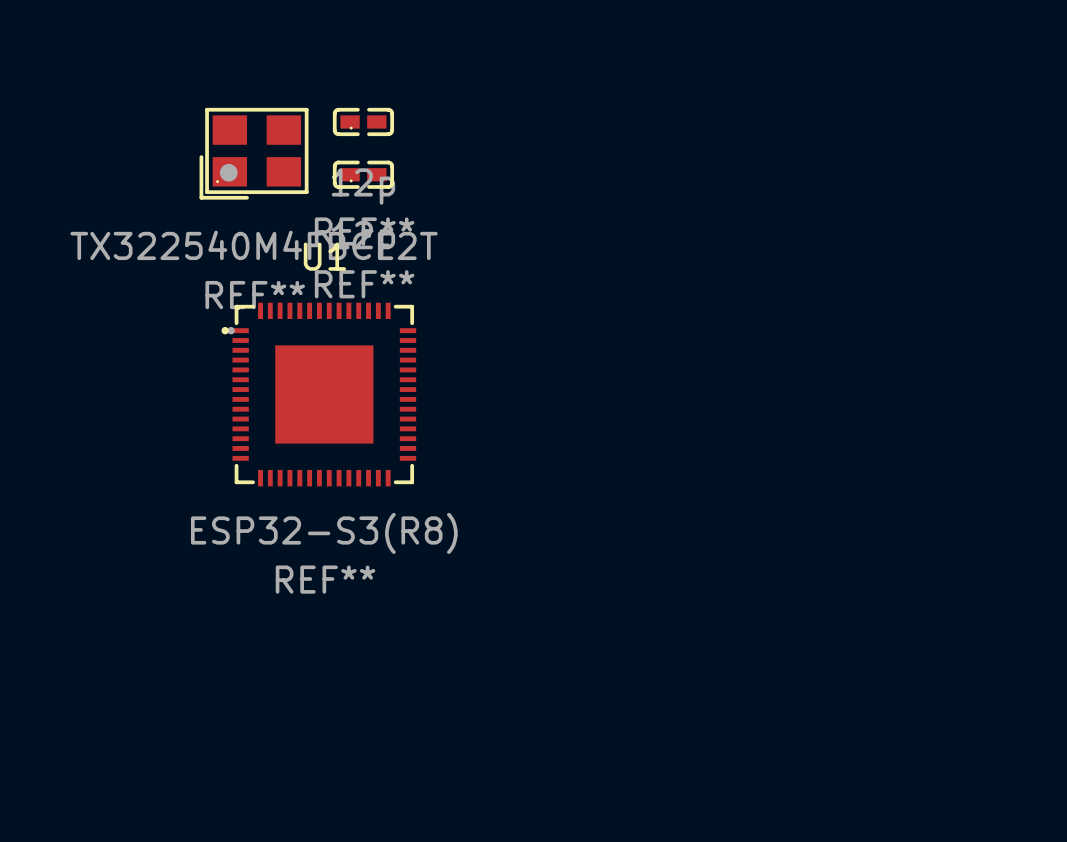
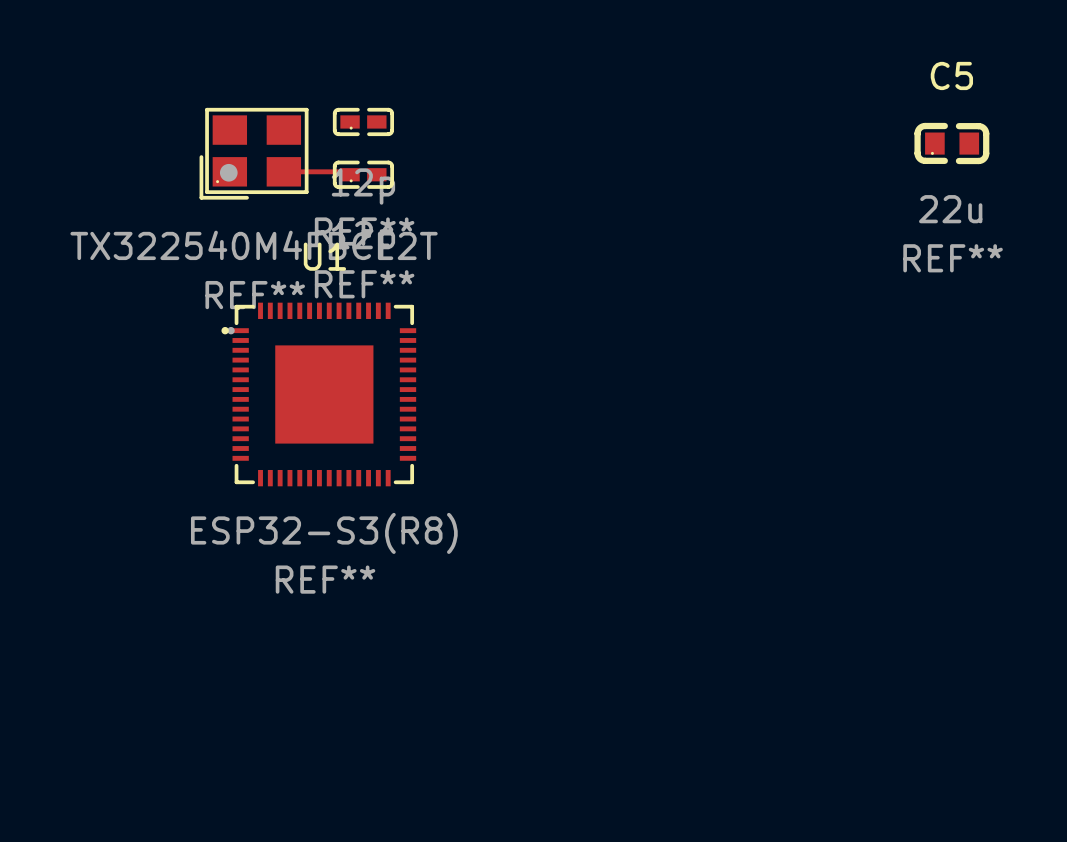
C5: none -> 22u (951, 143)
track: none -> (283, 171) (347, 171) (350, 174)

